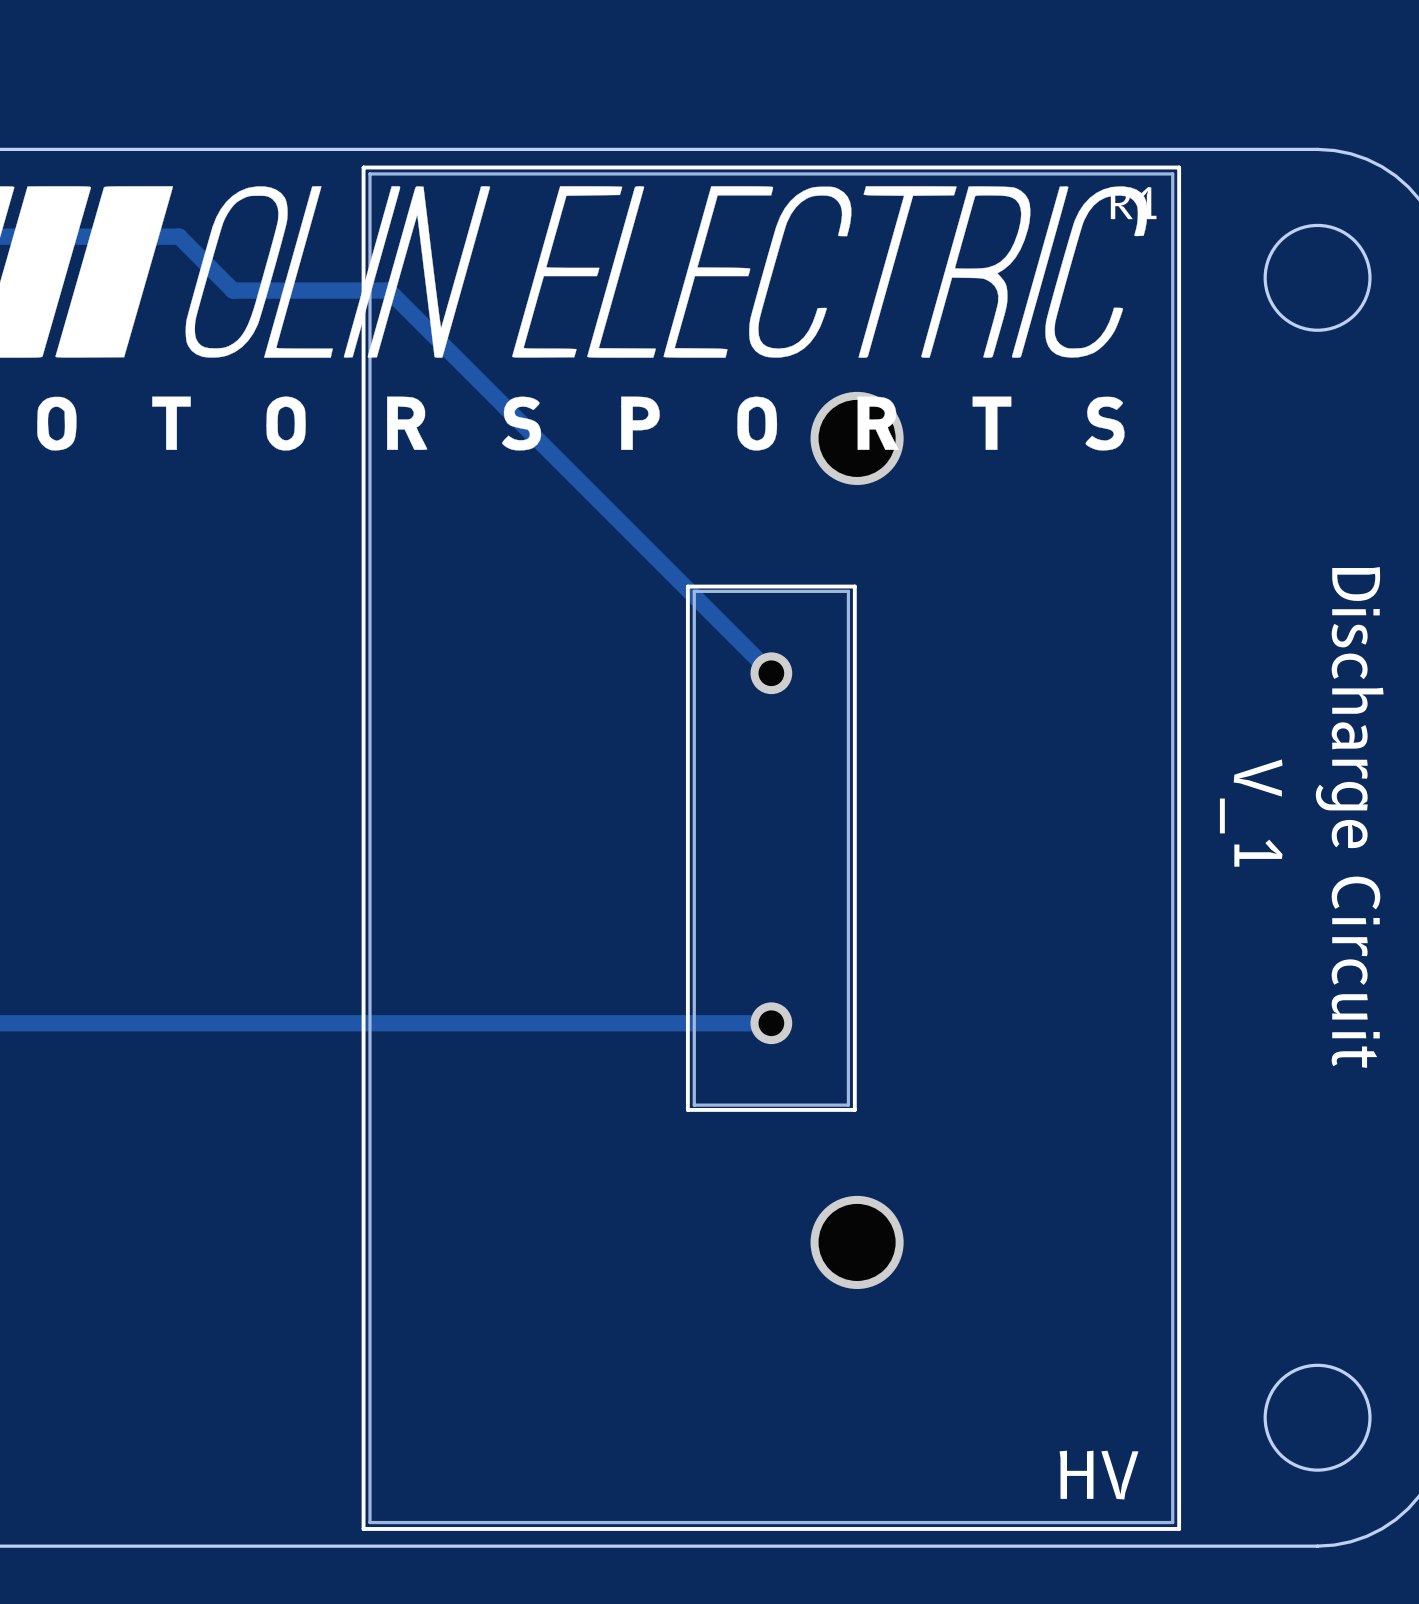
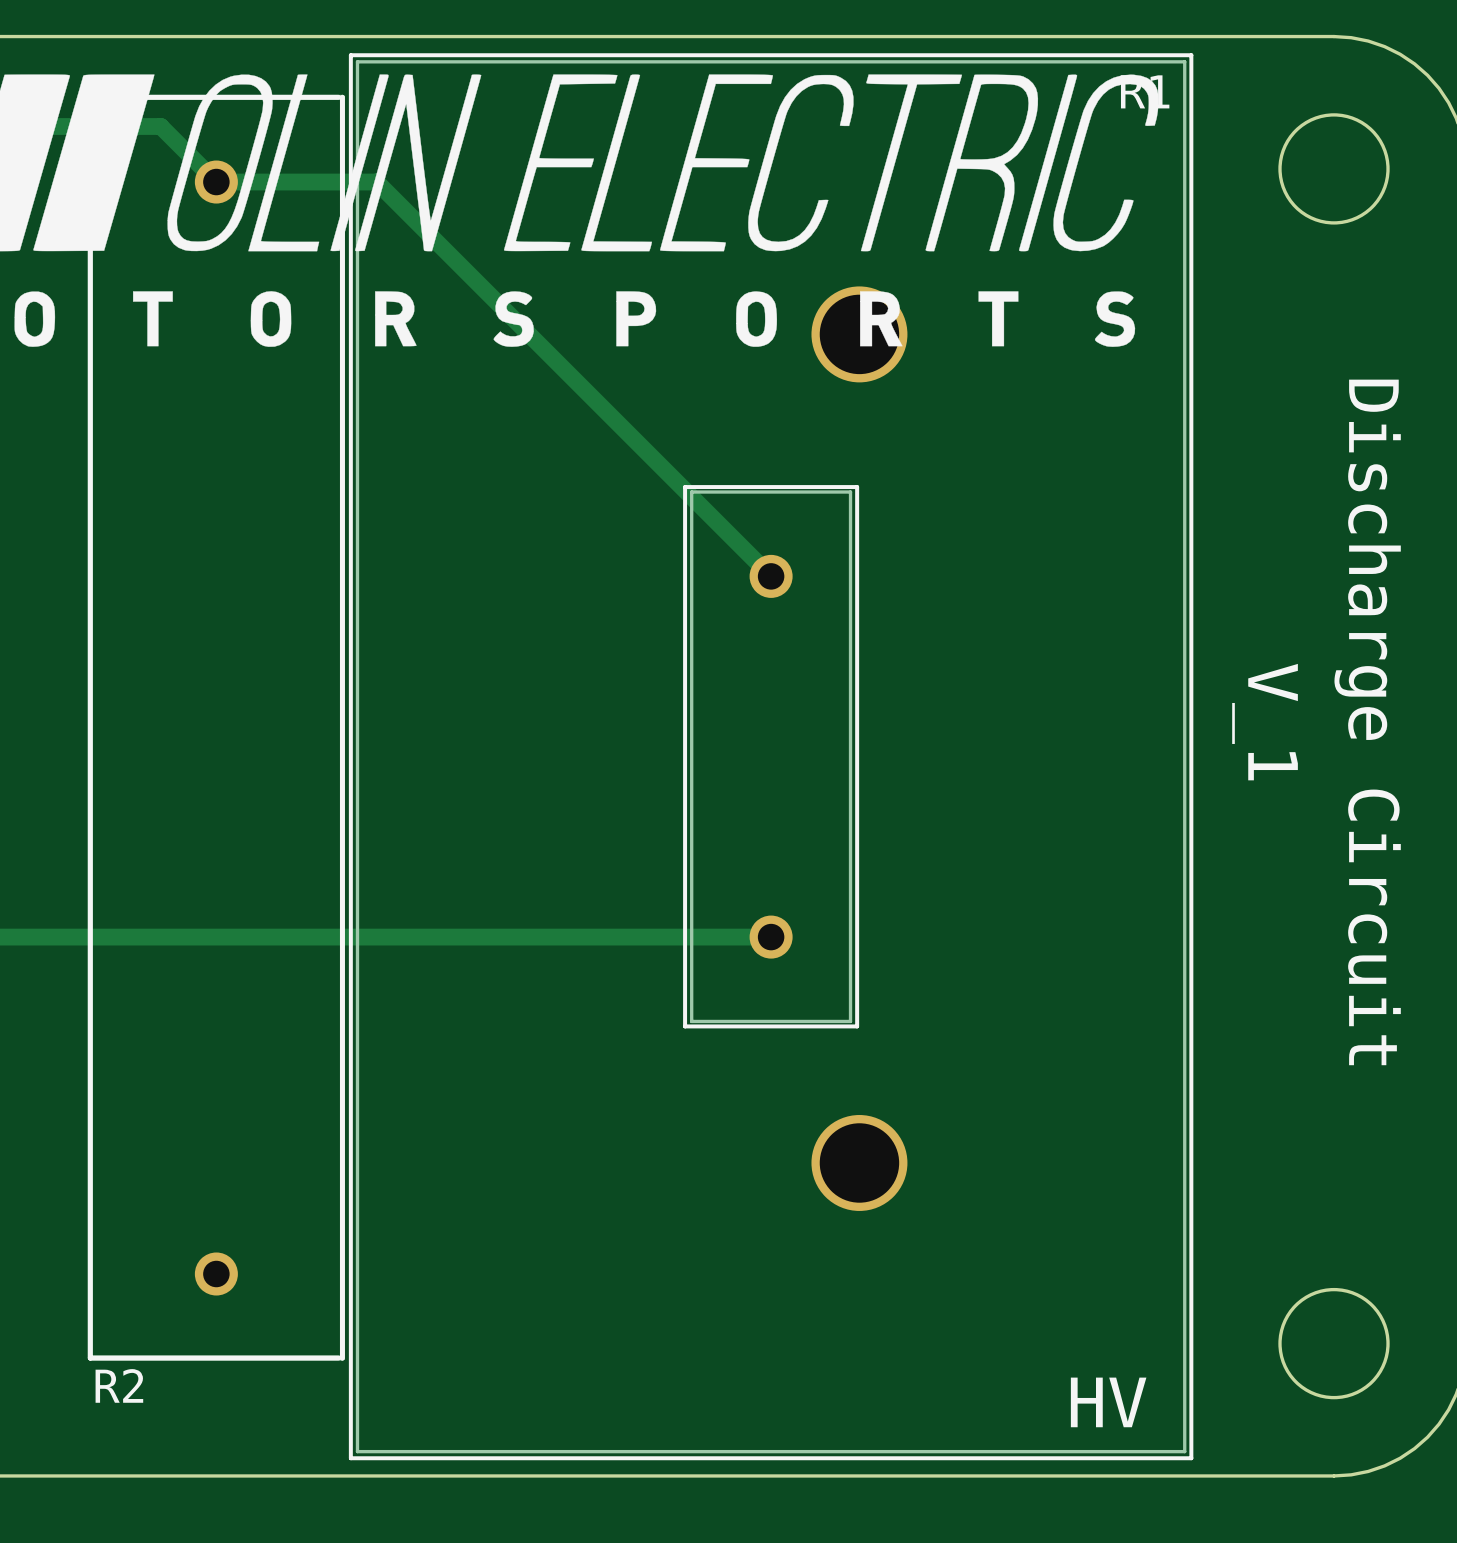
R2: none -> (216, 727)

